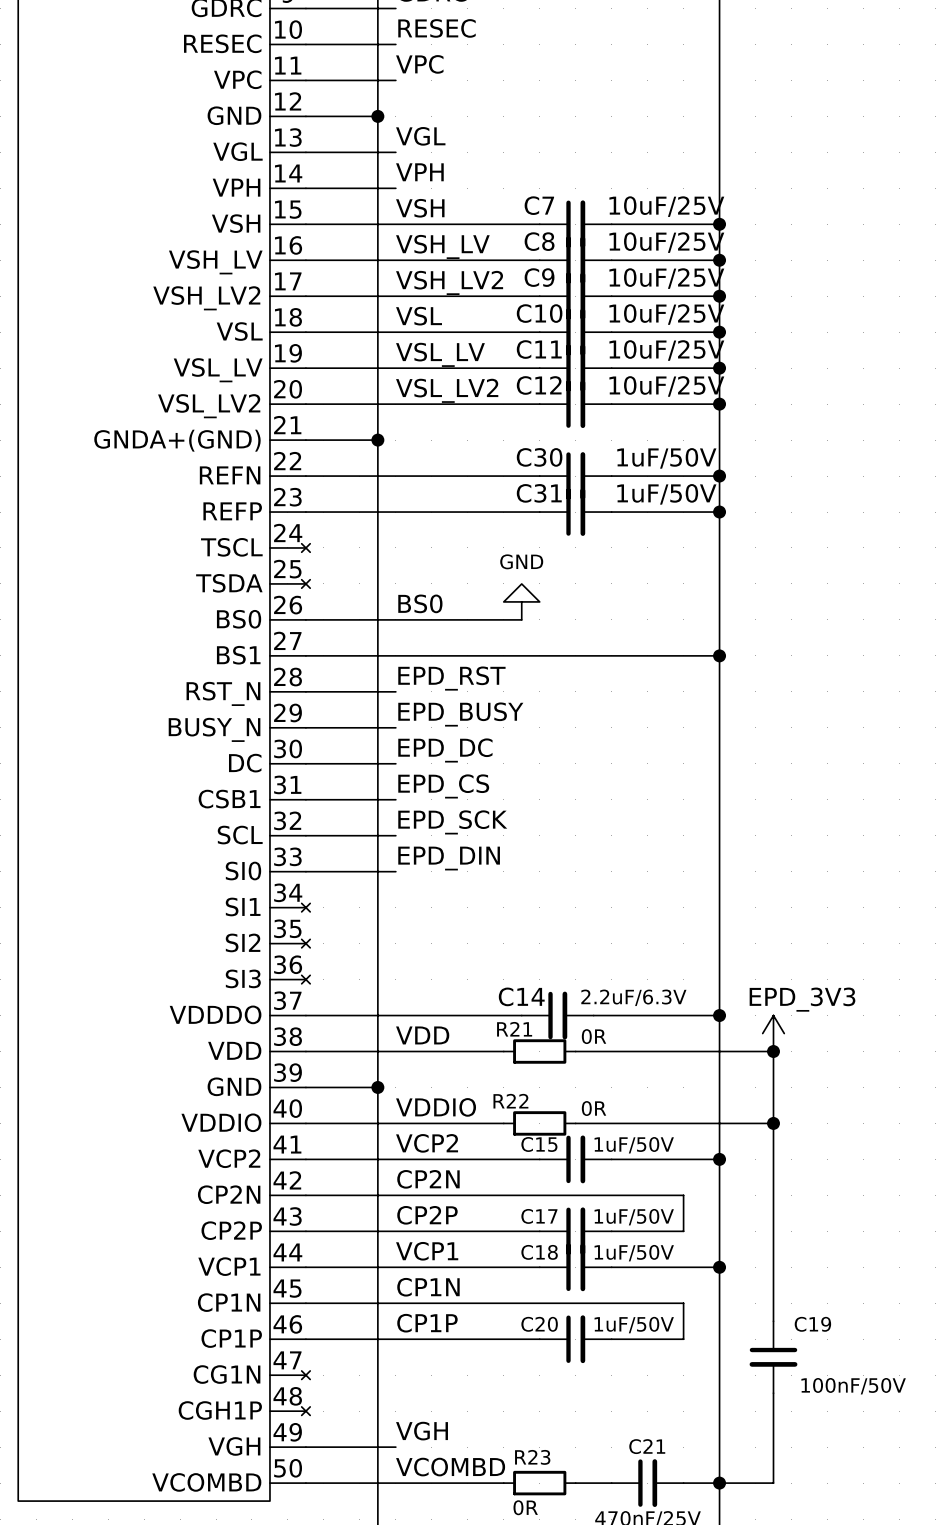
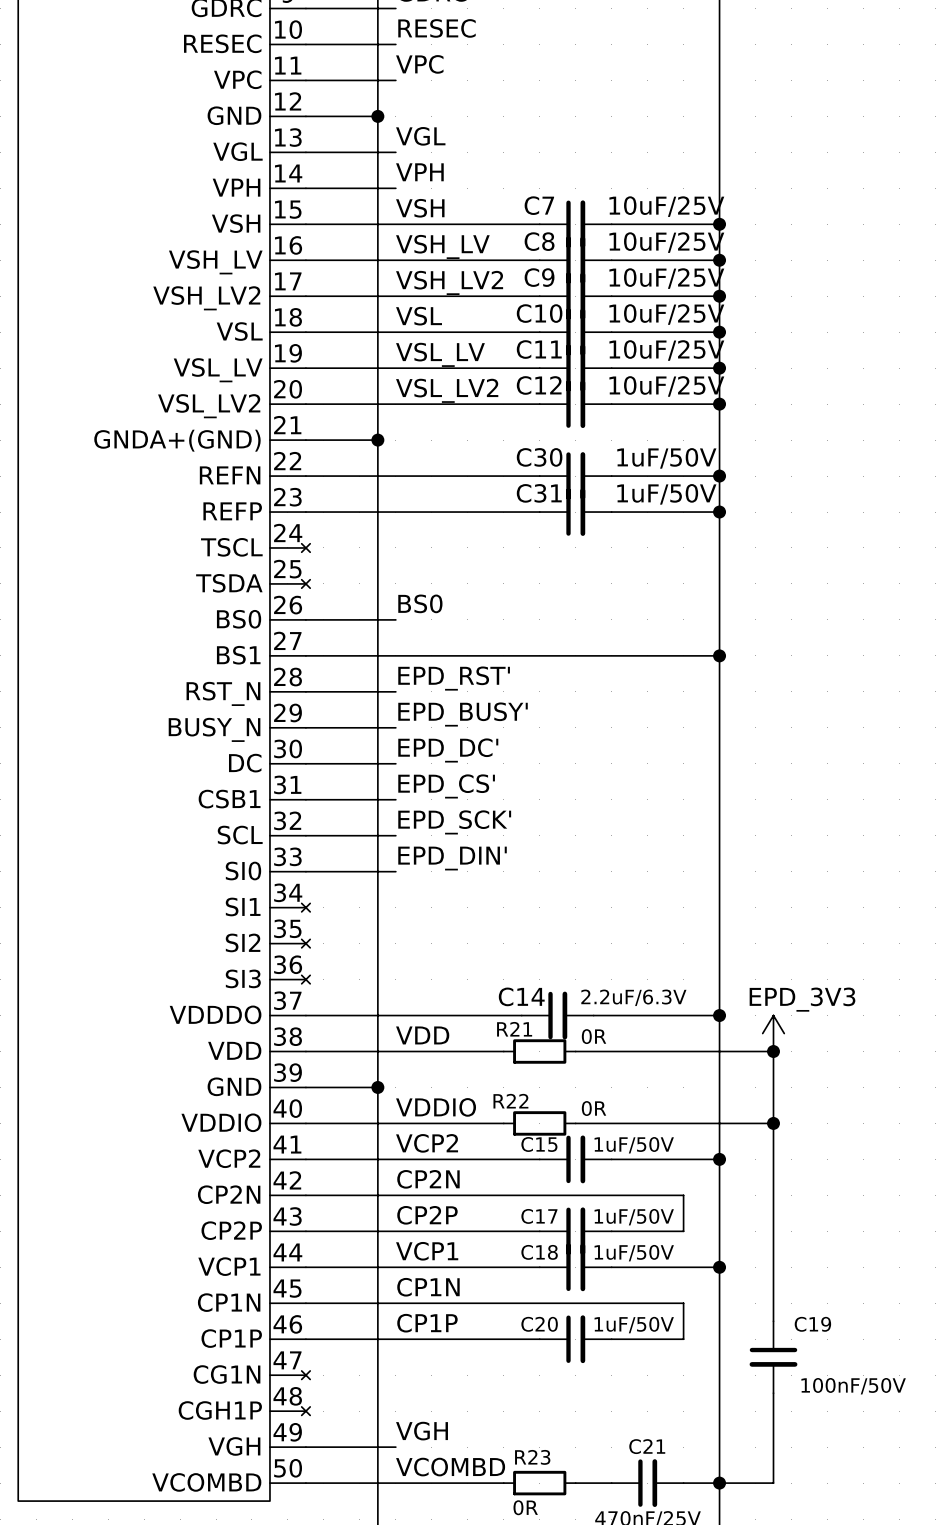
power symbol: GND (521, 601) -> none
wire: (395, 619) (521, 619) -> none
label: EPD_RST (451, 678) -> EPD_RST' (454, 678)
label: EPD_BUSY (460, 714) -> EPD_BUSY' (463, 714)
label: EPD_DC (445, 750) -> EPD_DC' (448, 750)
label: EPD_CS (443, 786) -> EPD_CS' (446, 786)
label: EPD_SCK (452, 822) -> EPD_SCK' (454, 822)
label: EPD_DIN (449, 858) -> EPD_DIN' (452, 858)

